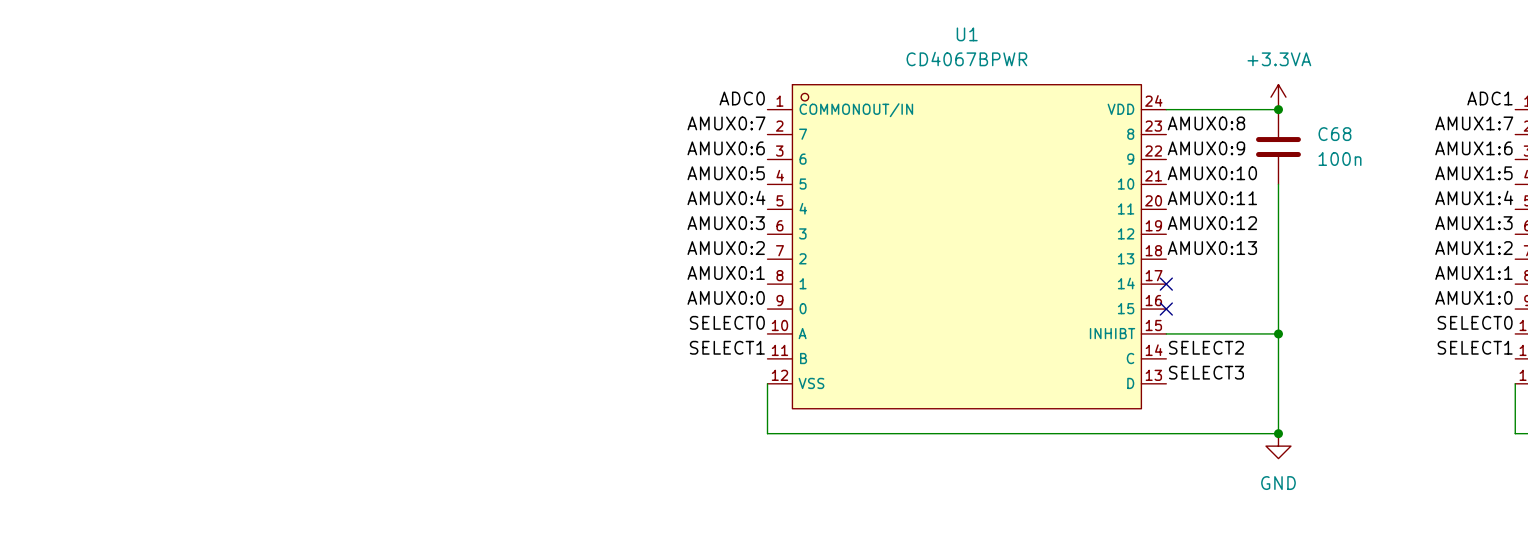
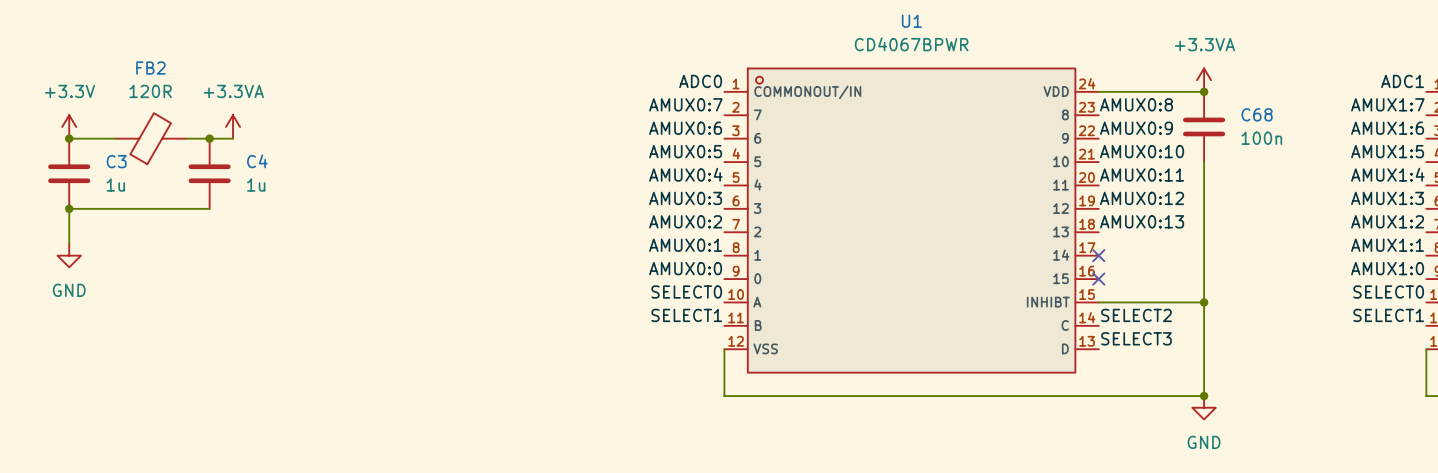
power symbol: none -> +3.3V (69, 126)
power symbol: none -> +3.3VA (233, 126)
wire: none -> (69, 138) (116, 138)
junction: none -> (69, 138)
FB2: none -> 120R (151, 138)
wire: none -> (186, 138) (233, 138)
junction: none -> (209, 138)
C3: none -> 1u (69, 173)
C4: none -> 1u (209, 173)
junction: none -> (69, 208)
wire: none -> (209, 208) (69, 208) (69, 243)
power symbol: none -> GND (69, 255)

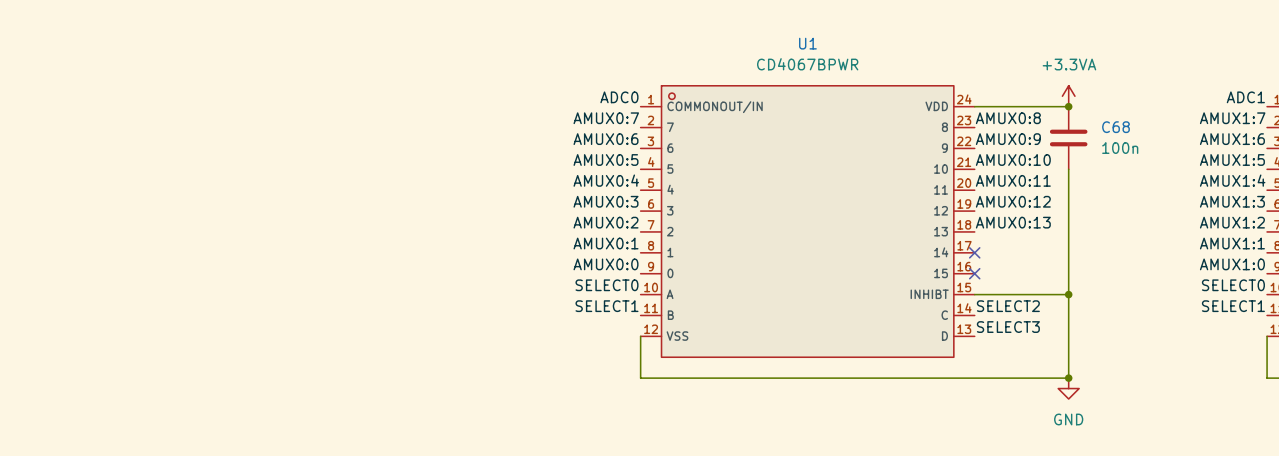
power symbol: +3.3V (69, 126) -> none
power symbol: +3.3VA (233, 126) -> none
wire: (69, 138) (116, 138) -> none
junction: (69, 138) -> none
FB2: 120R (151, 138) -> none
wire: (186, 138) (233, 138) -> none
junction: (209, 138) -> none
C3: 1u (69, 173) -> none
C4: 1u (209, 173) -> none
junction: (69, 208) -> none
wire: (209, 208) (69, 208) (69, 243) -> none
power symbol: GND (69, 255) -> none

